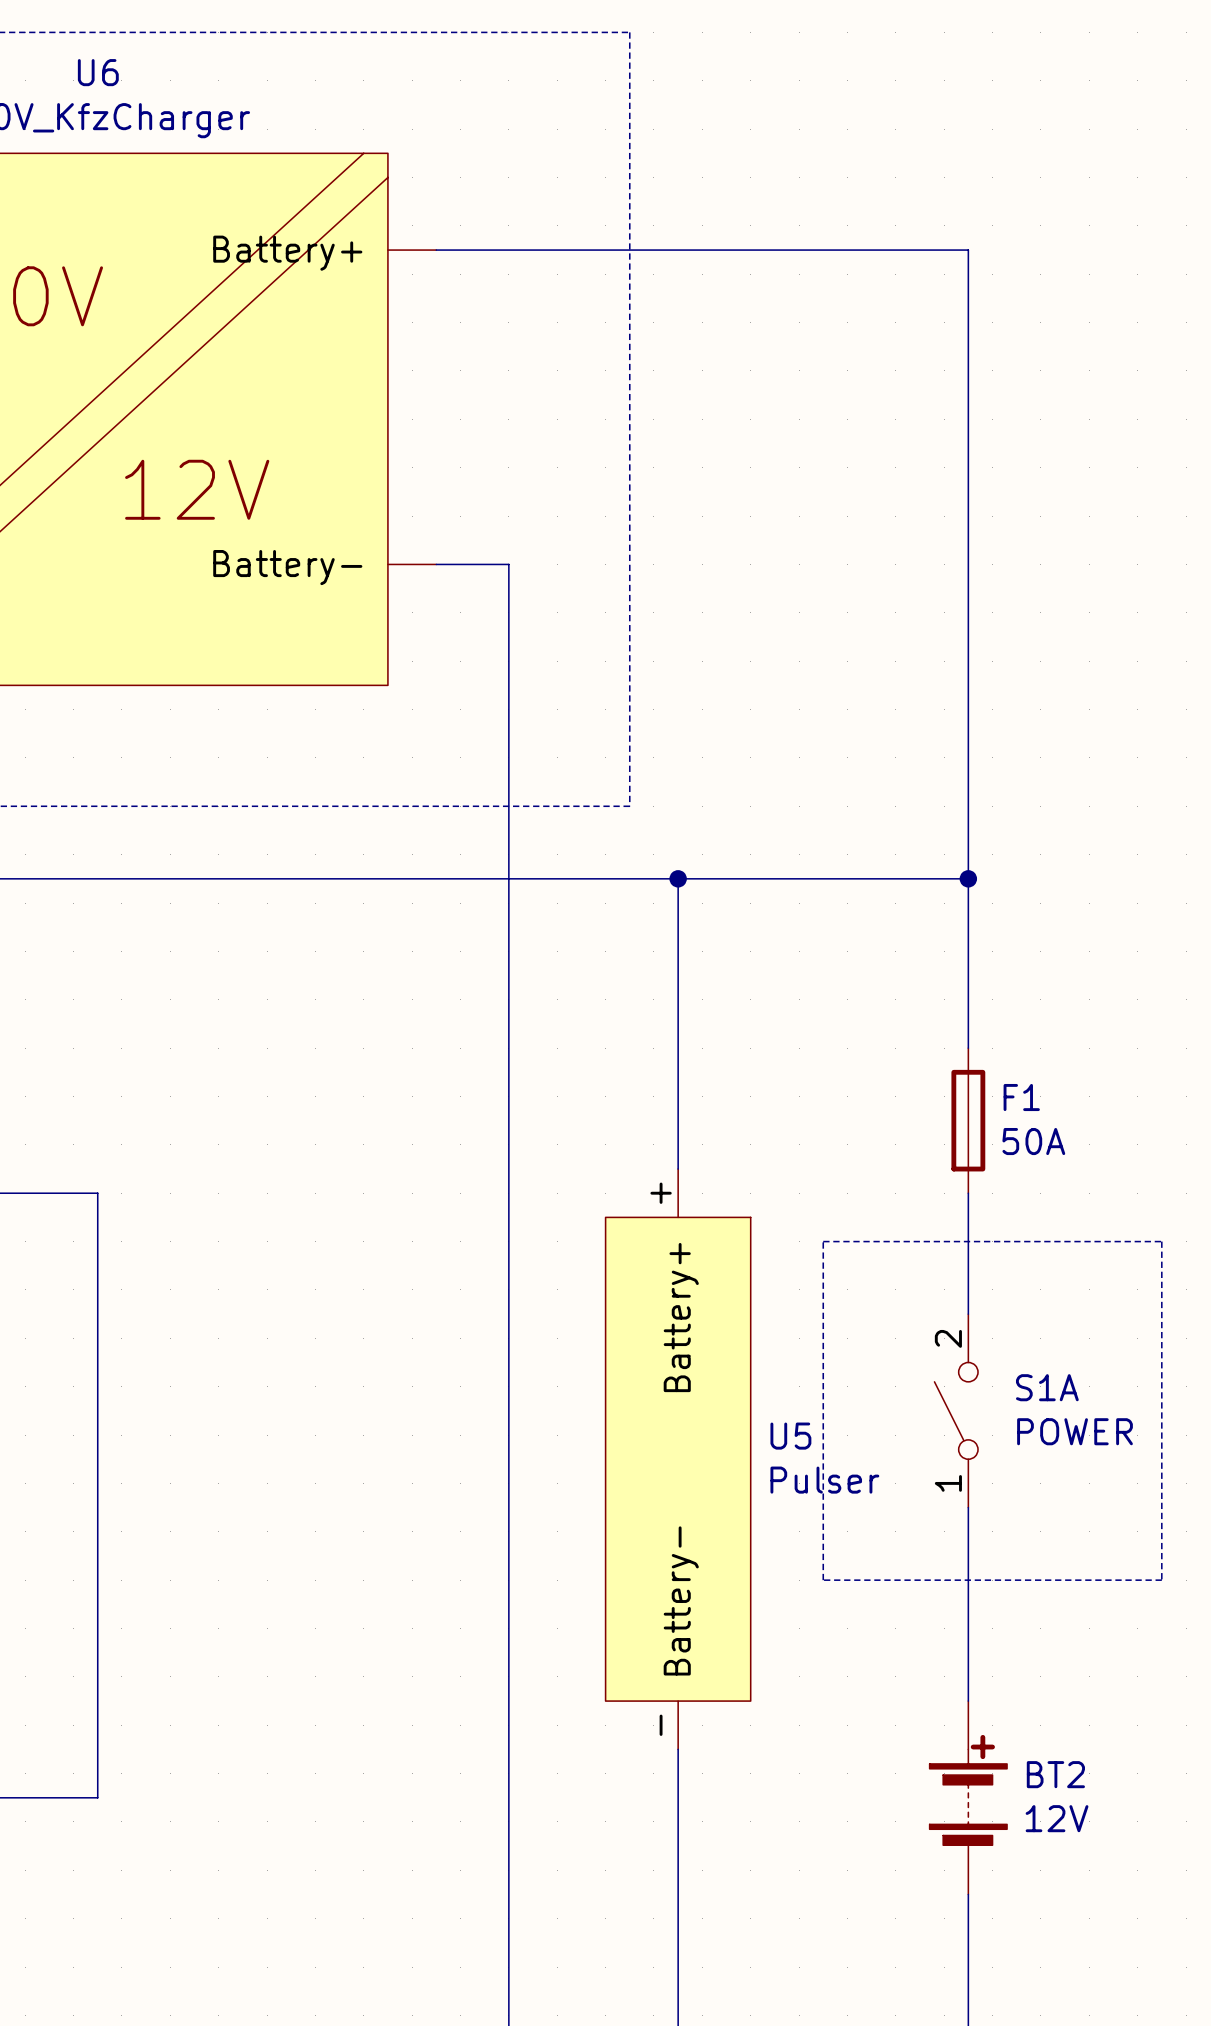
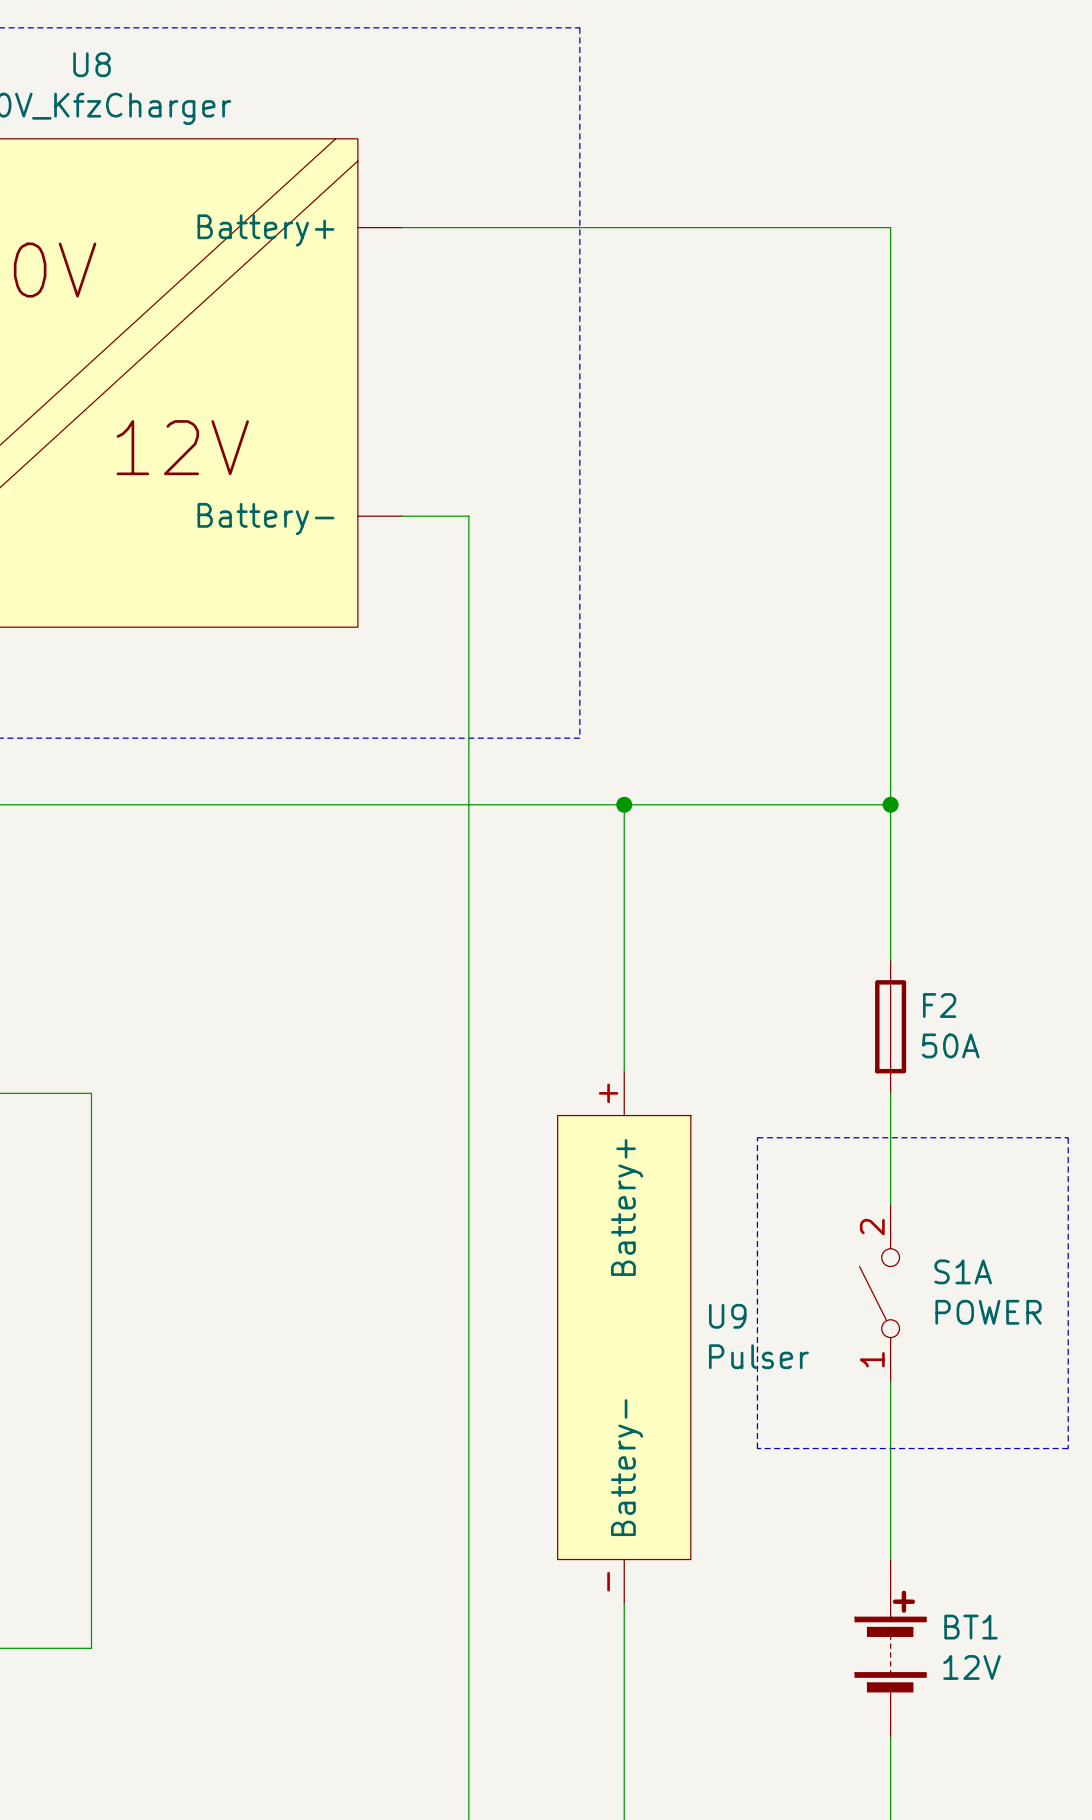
U6 name: U6 (98, 72) -> U8 (92, 64)
F1 name: F1 (1021, 1097) -> F2 (939, 1005)
U5 name: U5 (790, 1436) -> U9 (727, 1316)
BT2 name: BT2 (1055, 1774) -> BT1 (970, 1627)

